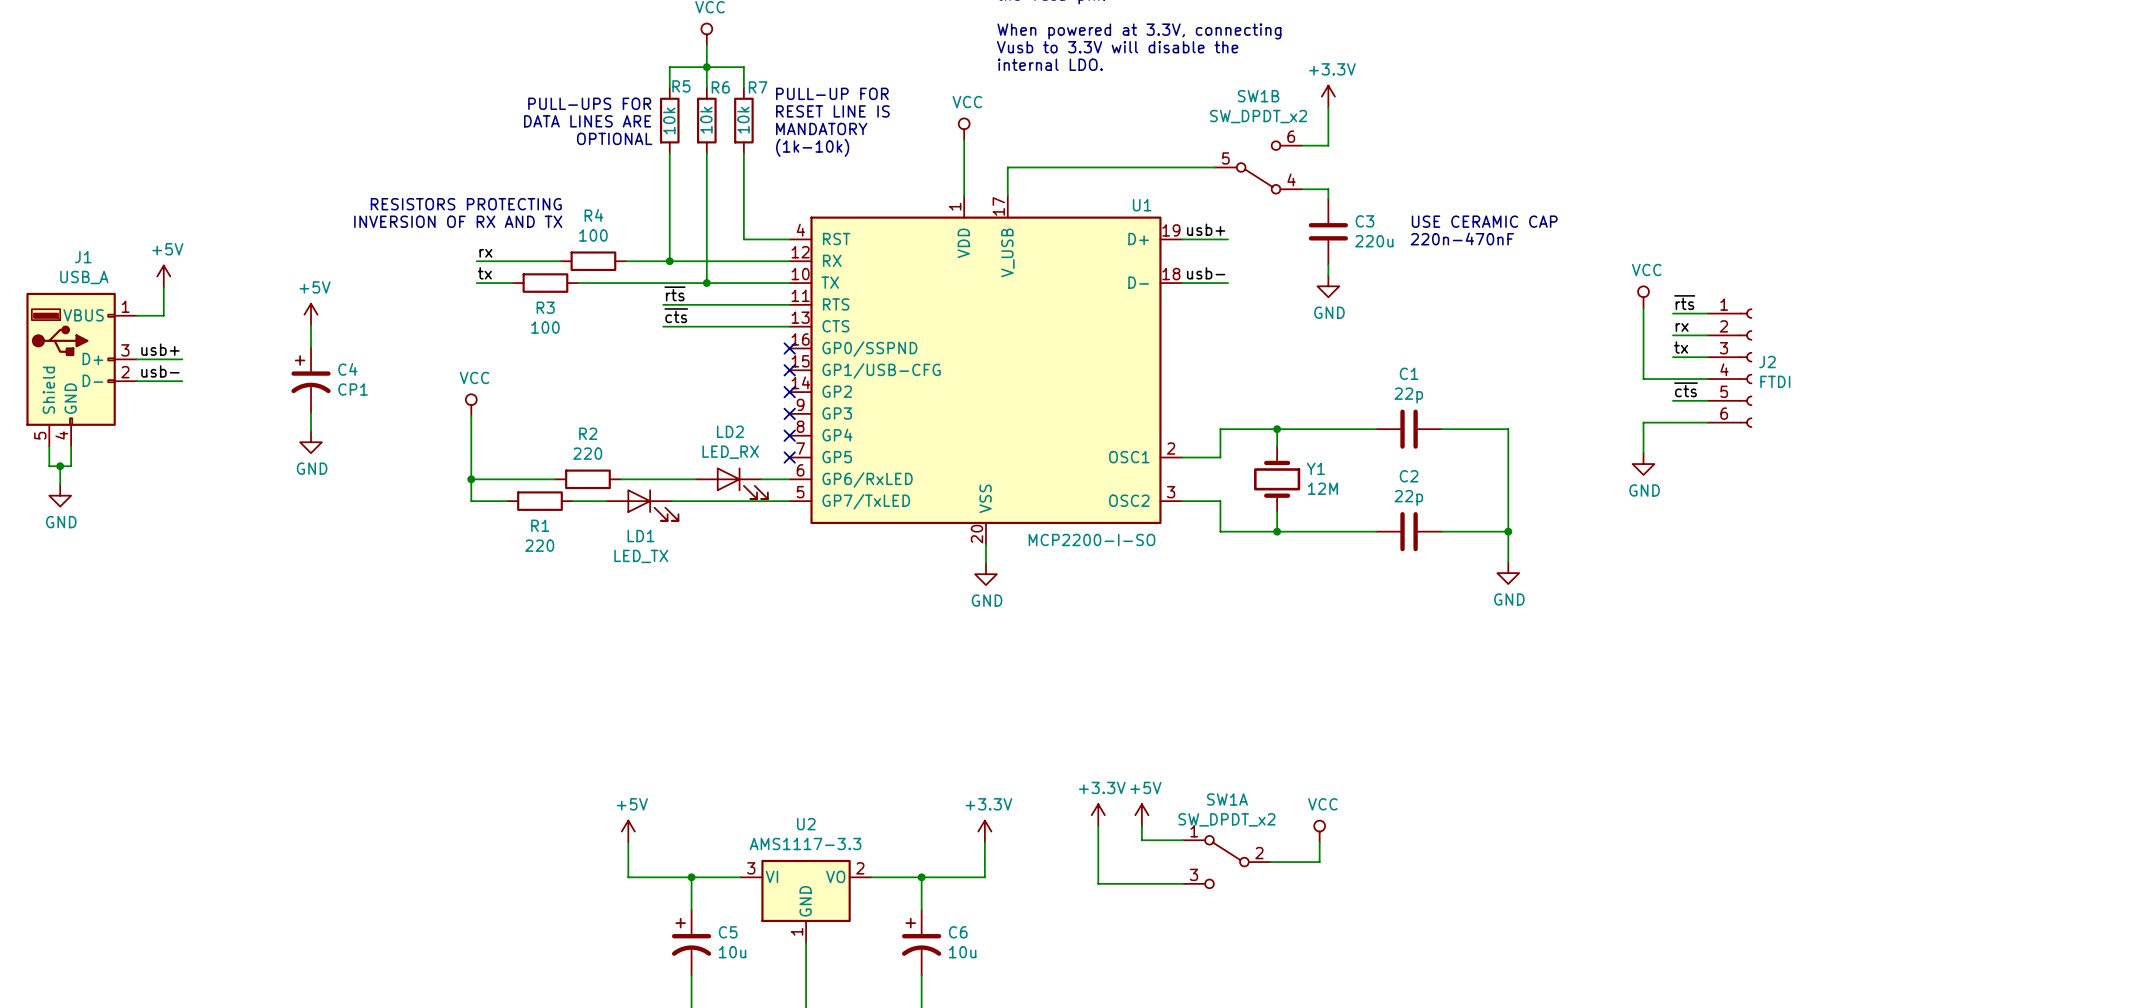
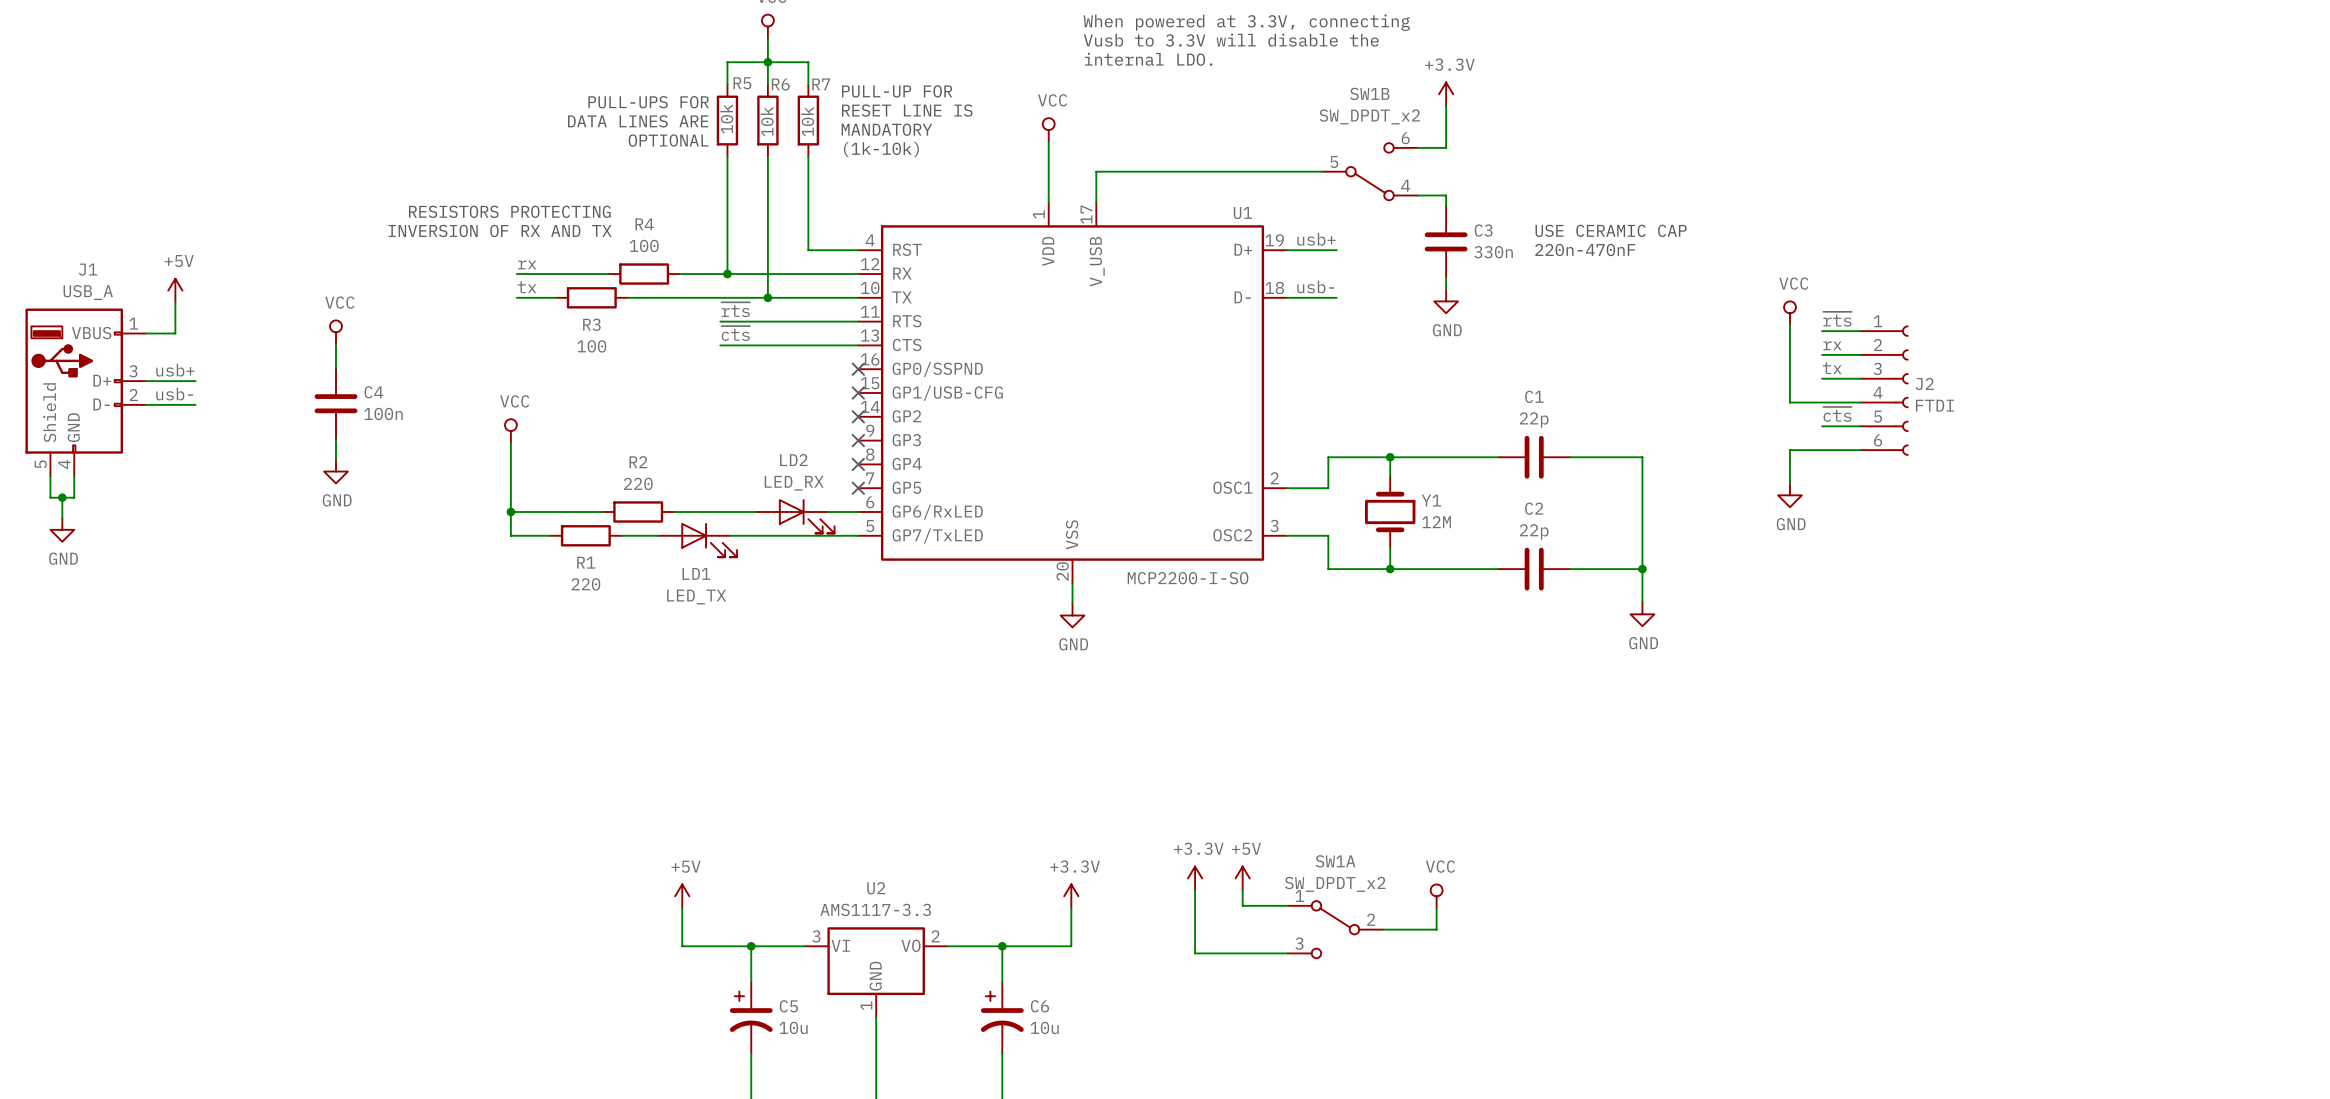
C3 value: 220u (1374, 241) -> 330n (1493, 252)
power symbol: +5V (311, 314) -> VCC (336, 332)
C4 symbol: [291, 347, 331, 413] -> [314, 368, 358, 440]
C4 value: CP1 (353, 389) -> 100n (383, 413)

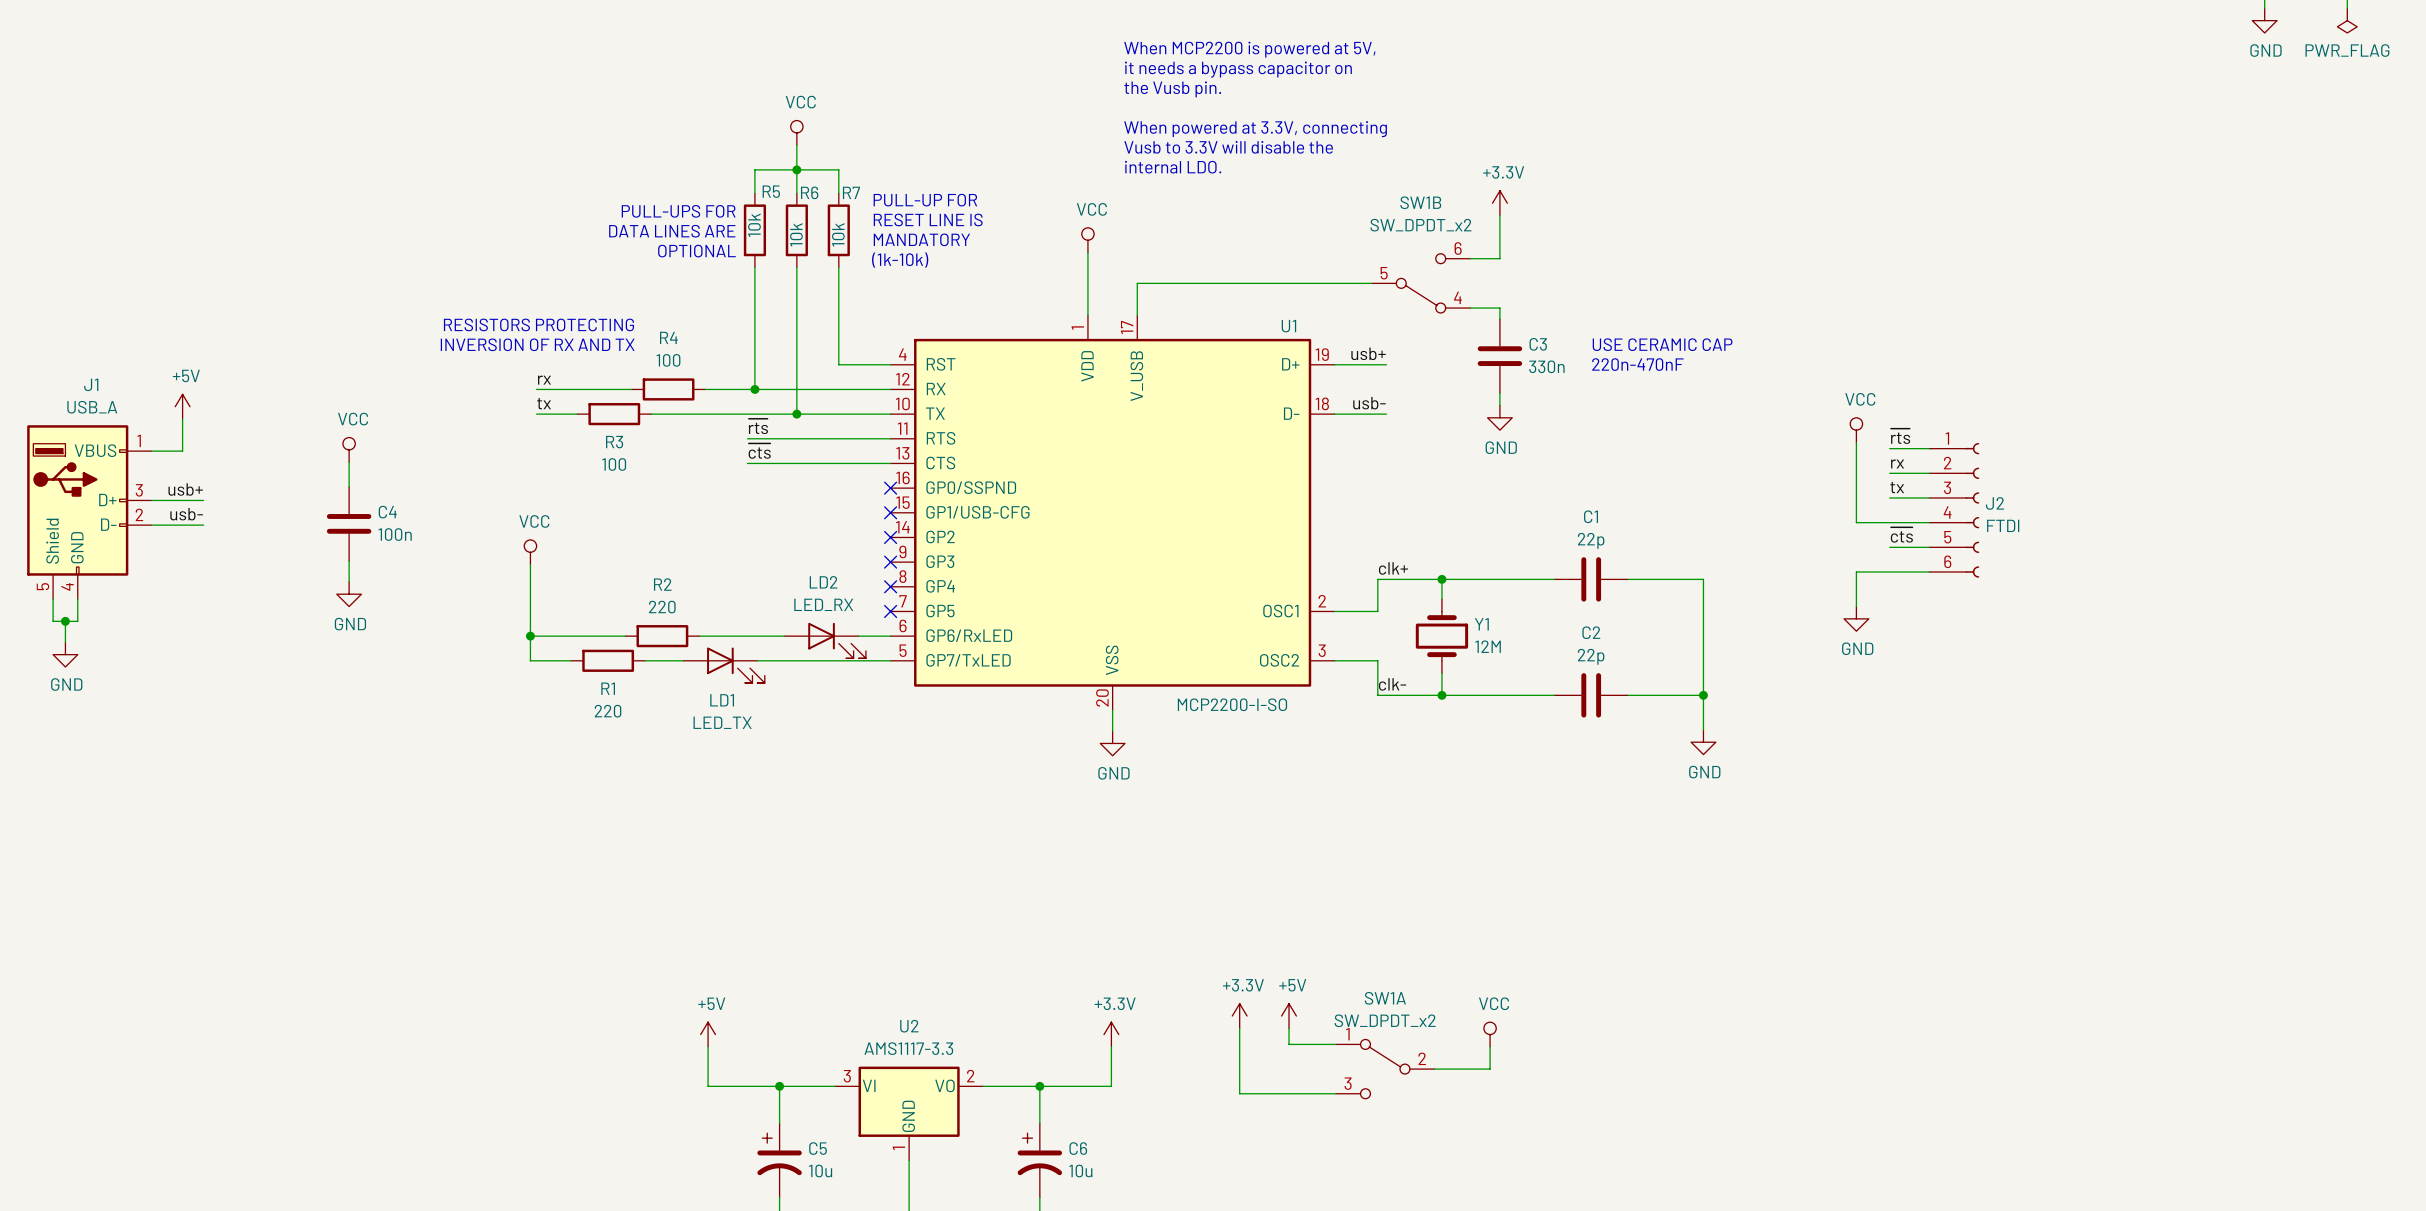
label: none -> clk+ (1393, 568)
label: none -> clk- (1392, 684)

